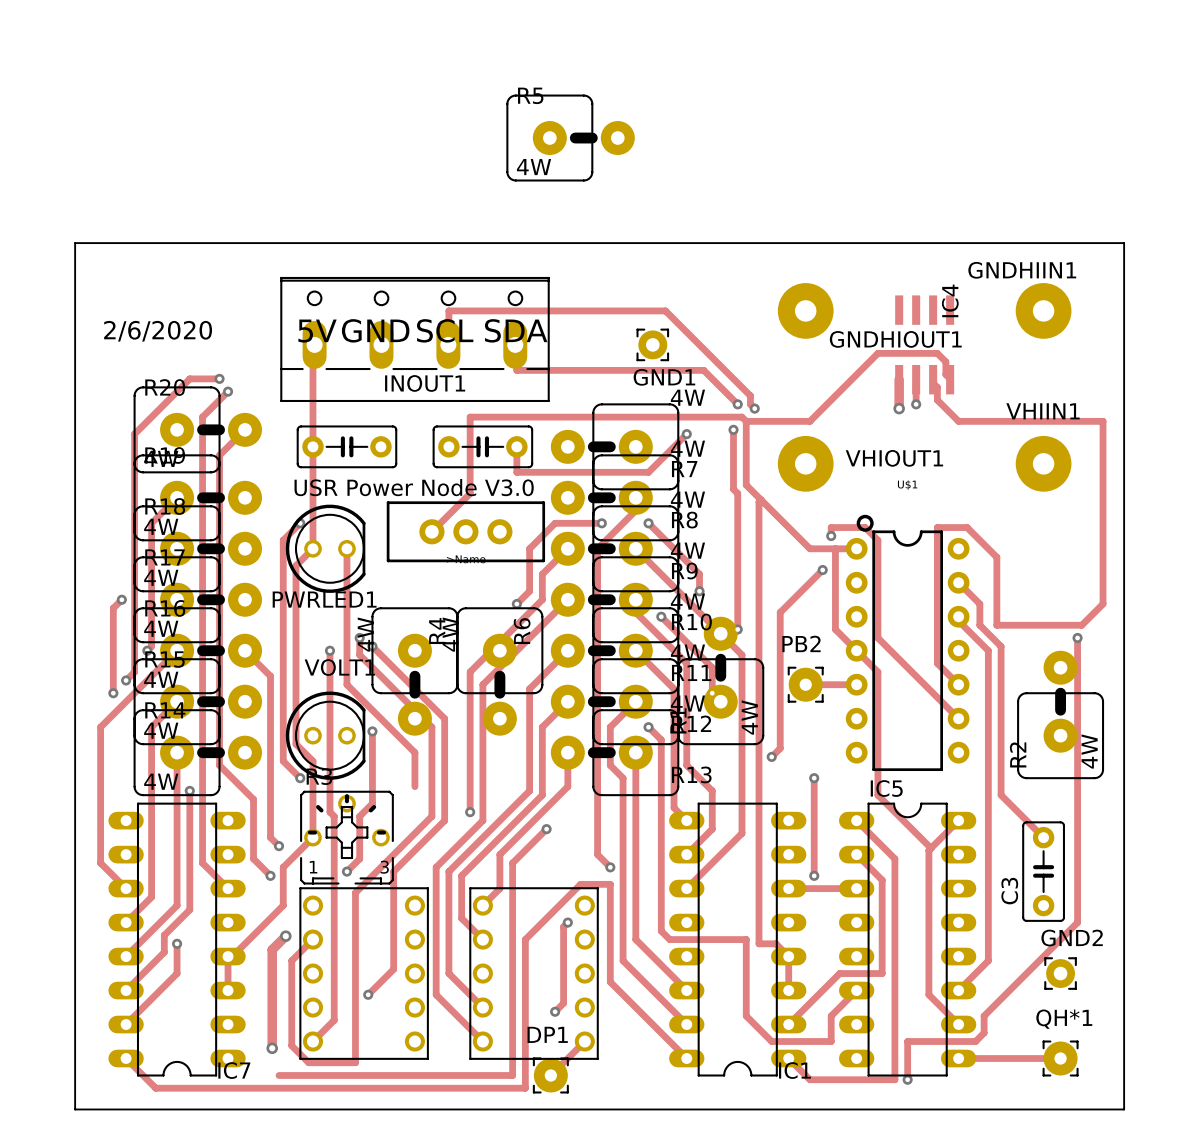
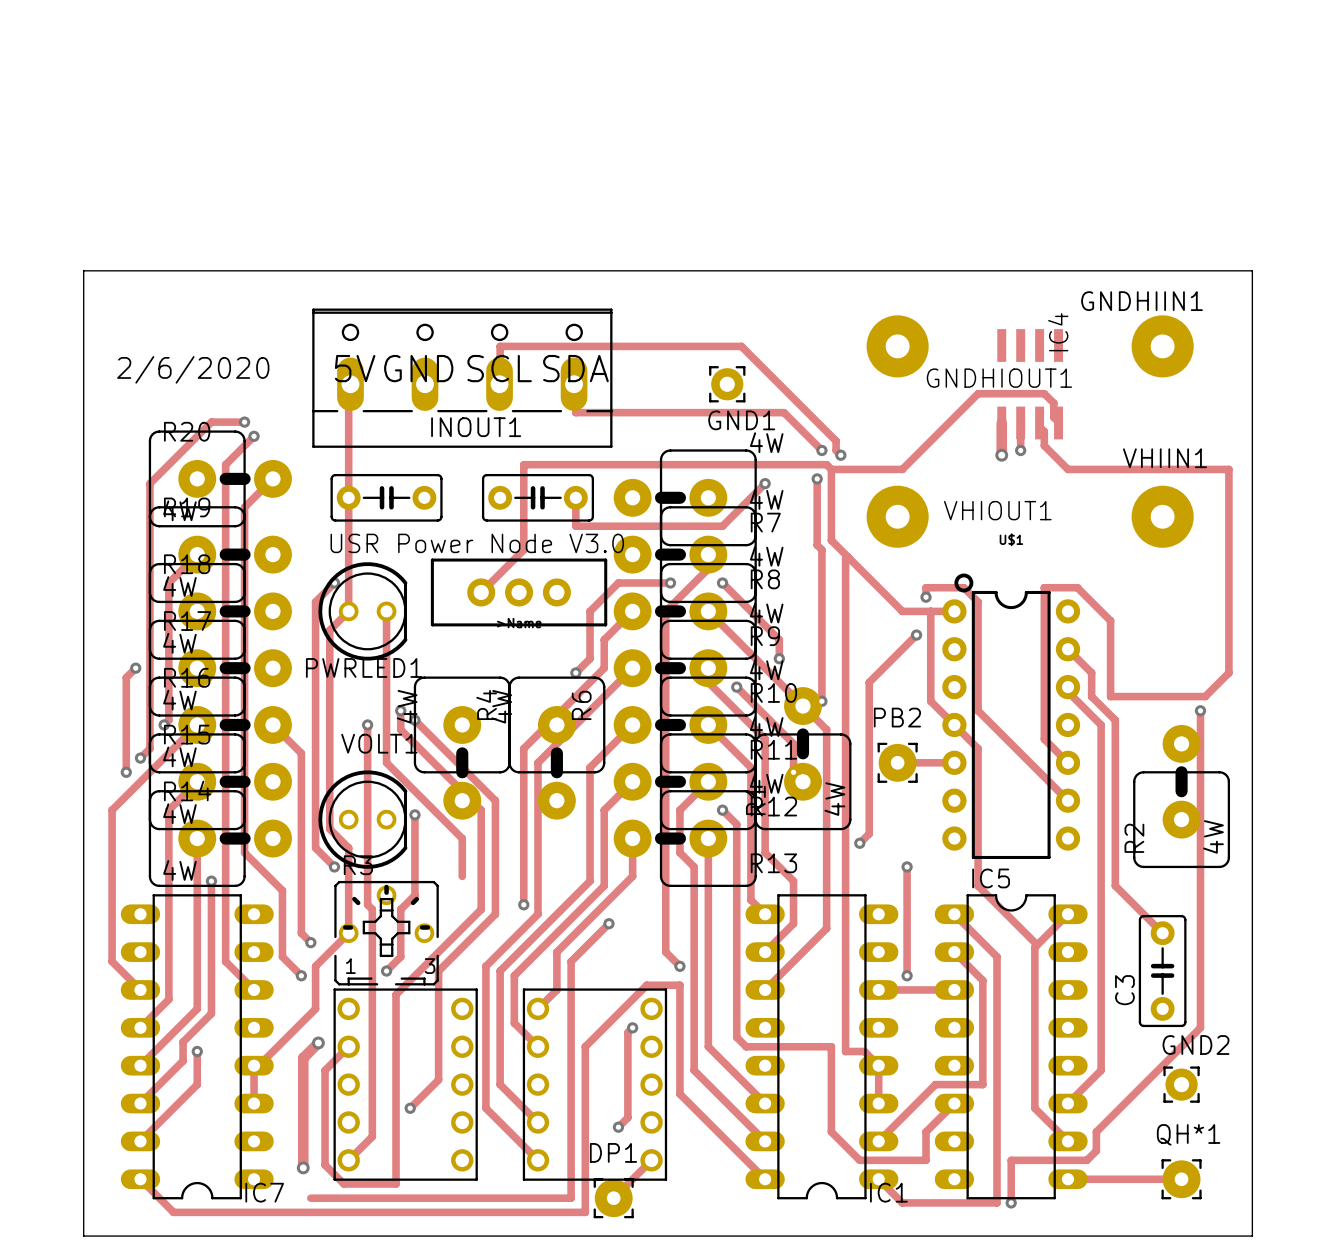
R5: (570, 138) -> none

